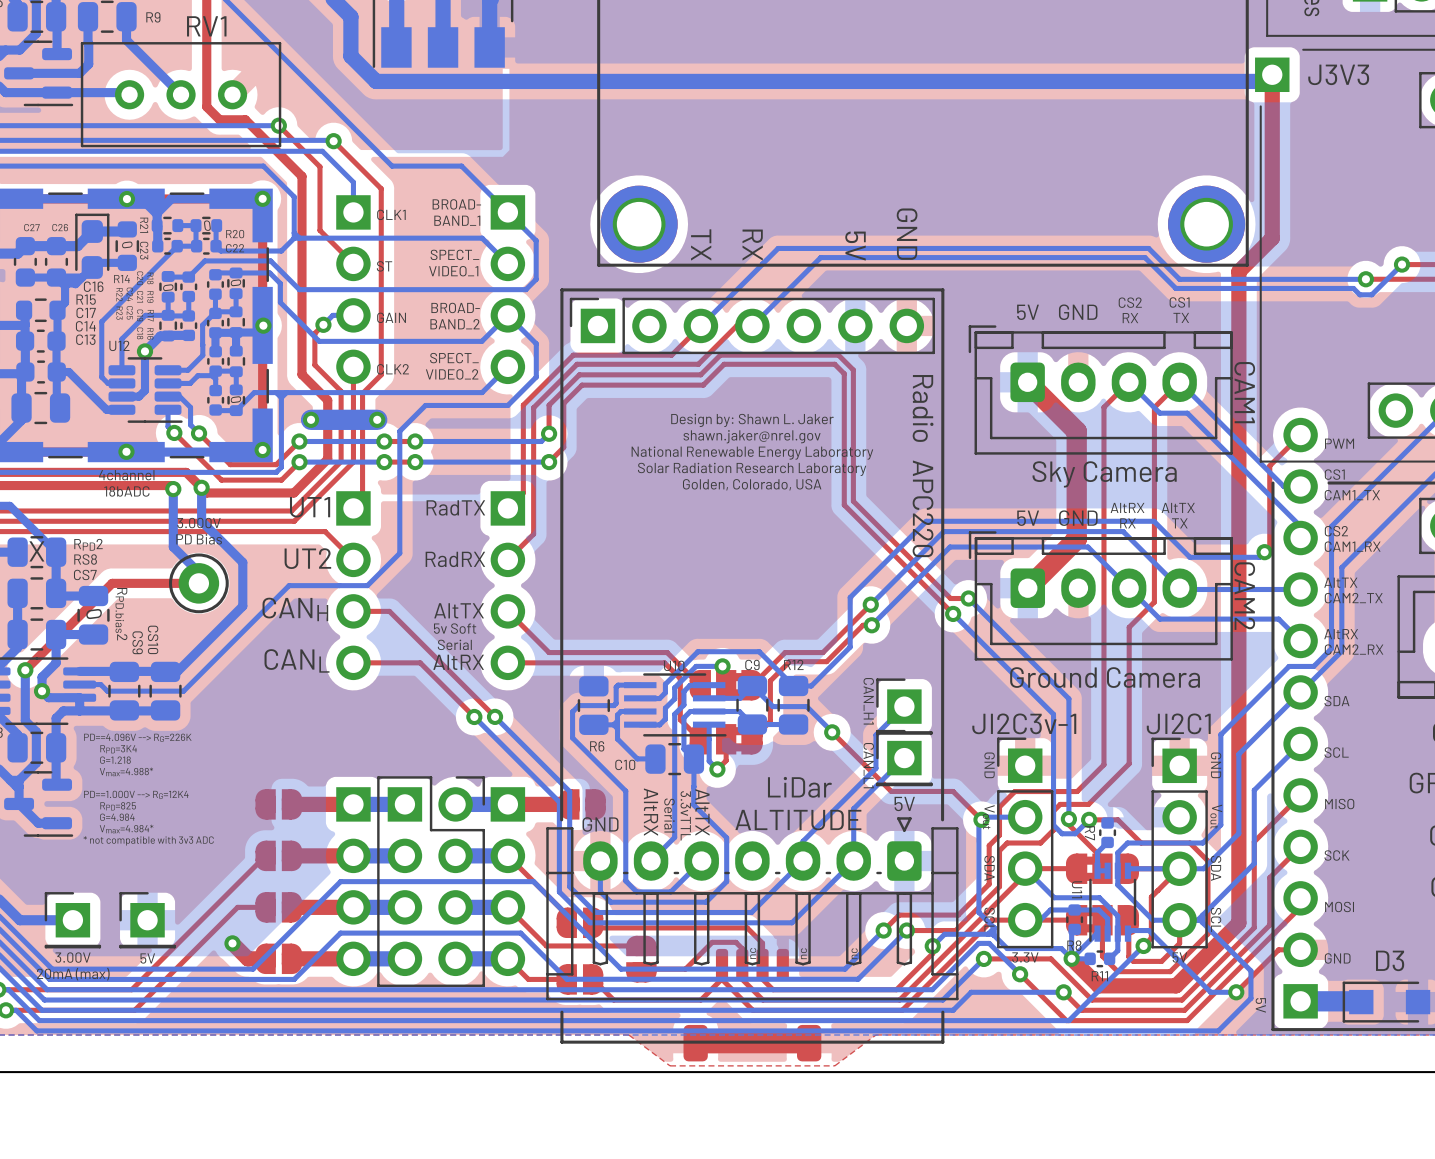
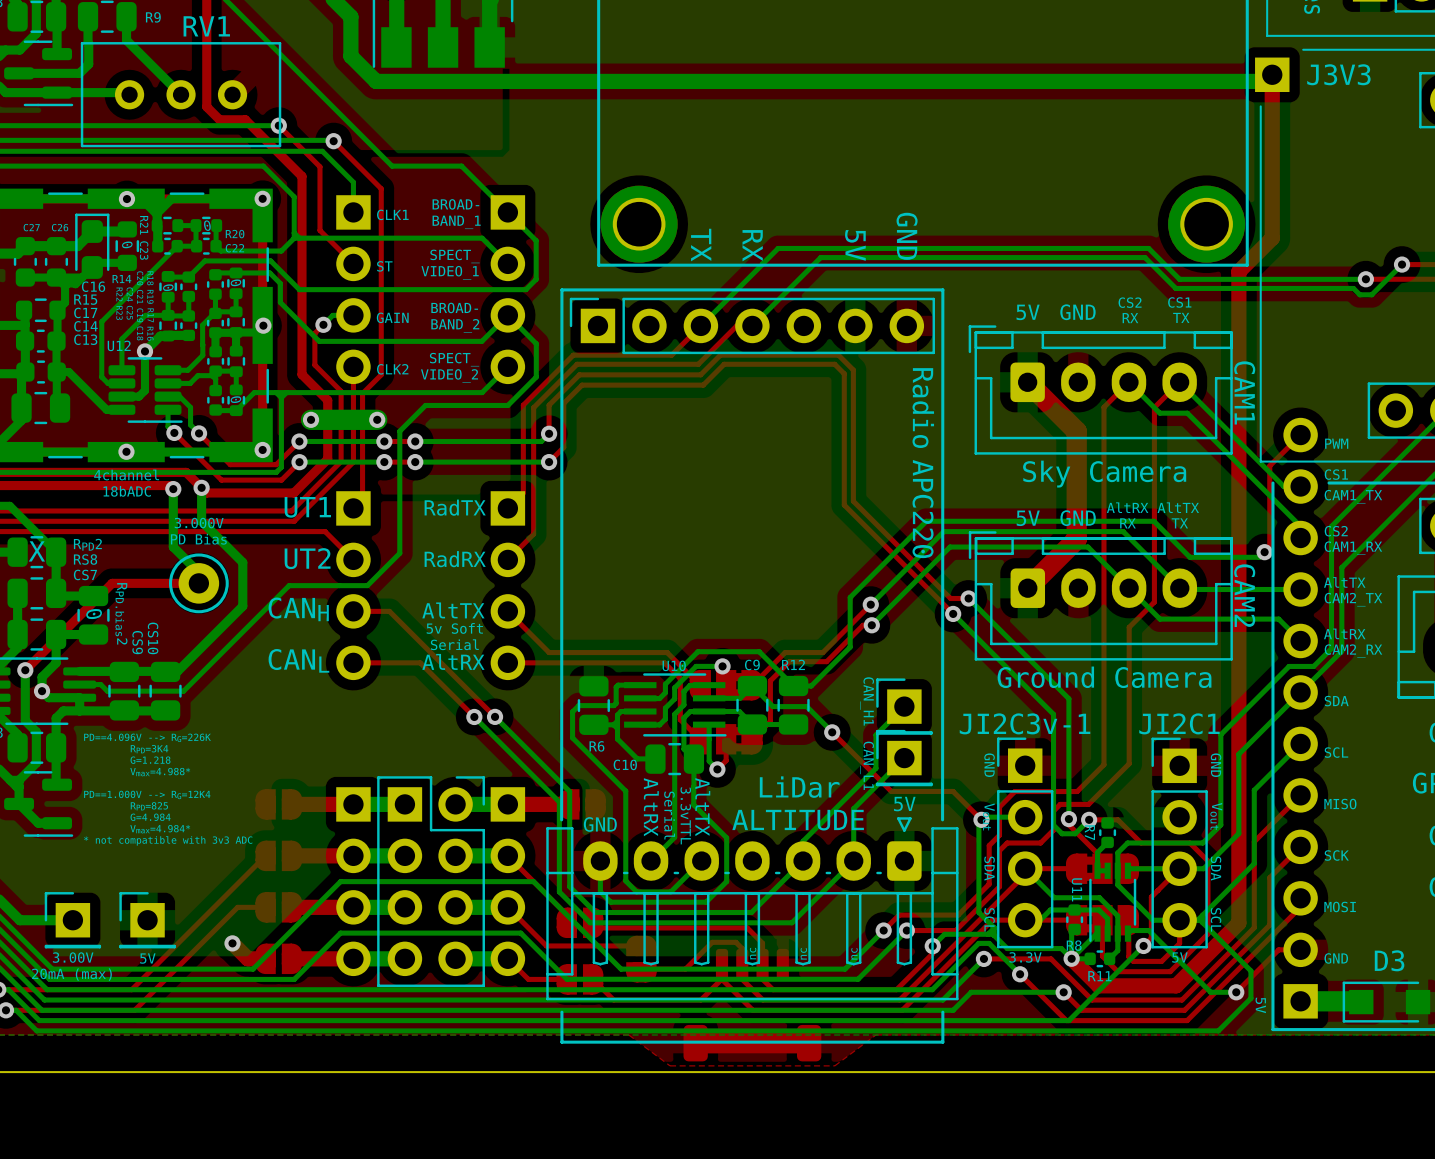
text: Design by: Shawn L. Jaker (752, 420) -> none
text: shawn.jaker@nrel.gov (752, 436) -> none
text: National Renewable Energy Laboratory (752, 453) -> none
text: Solar Radiation Research Laboratory (752, 469) -> none
text: Golden, Colorado, USA (752, 484) -> none

